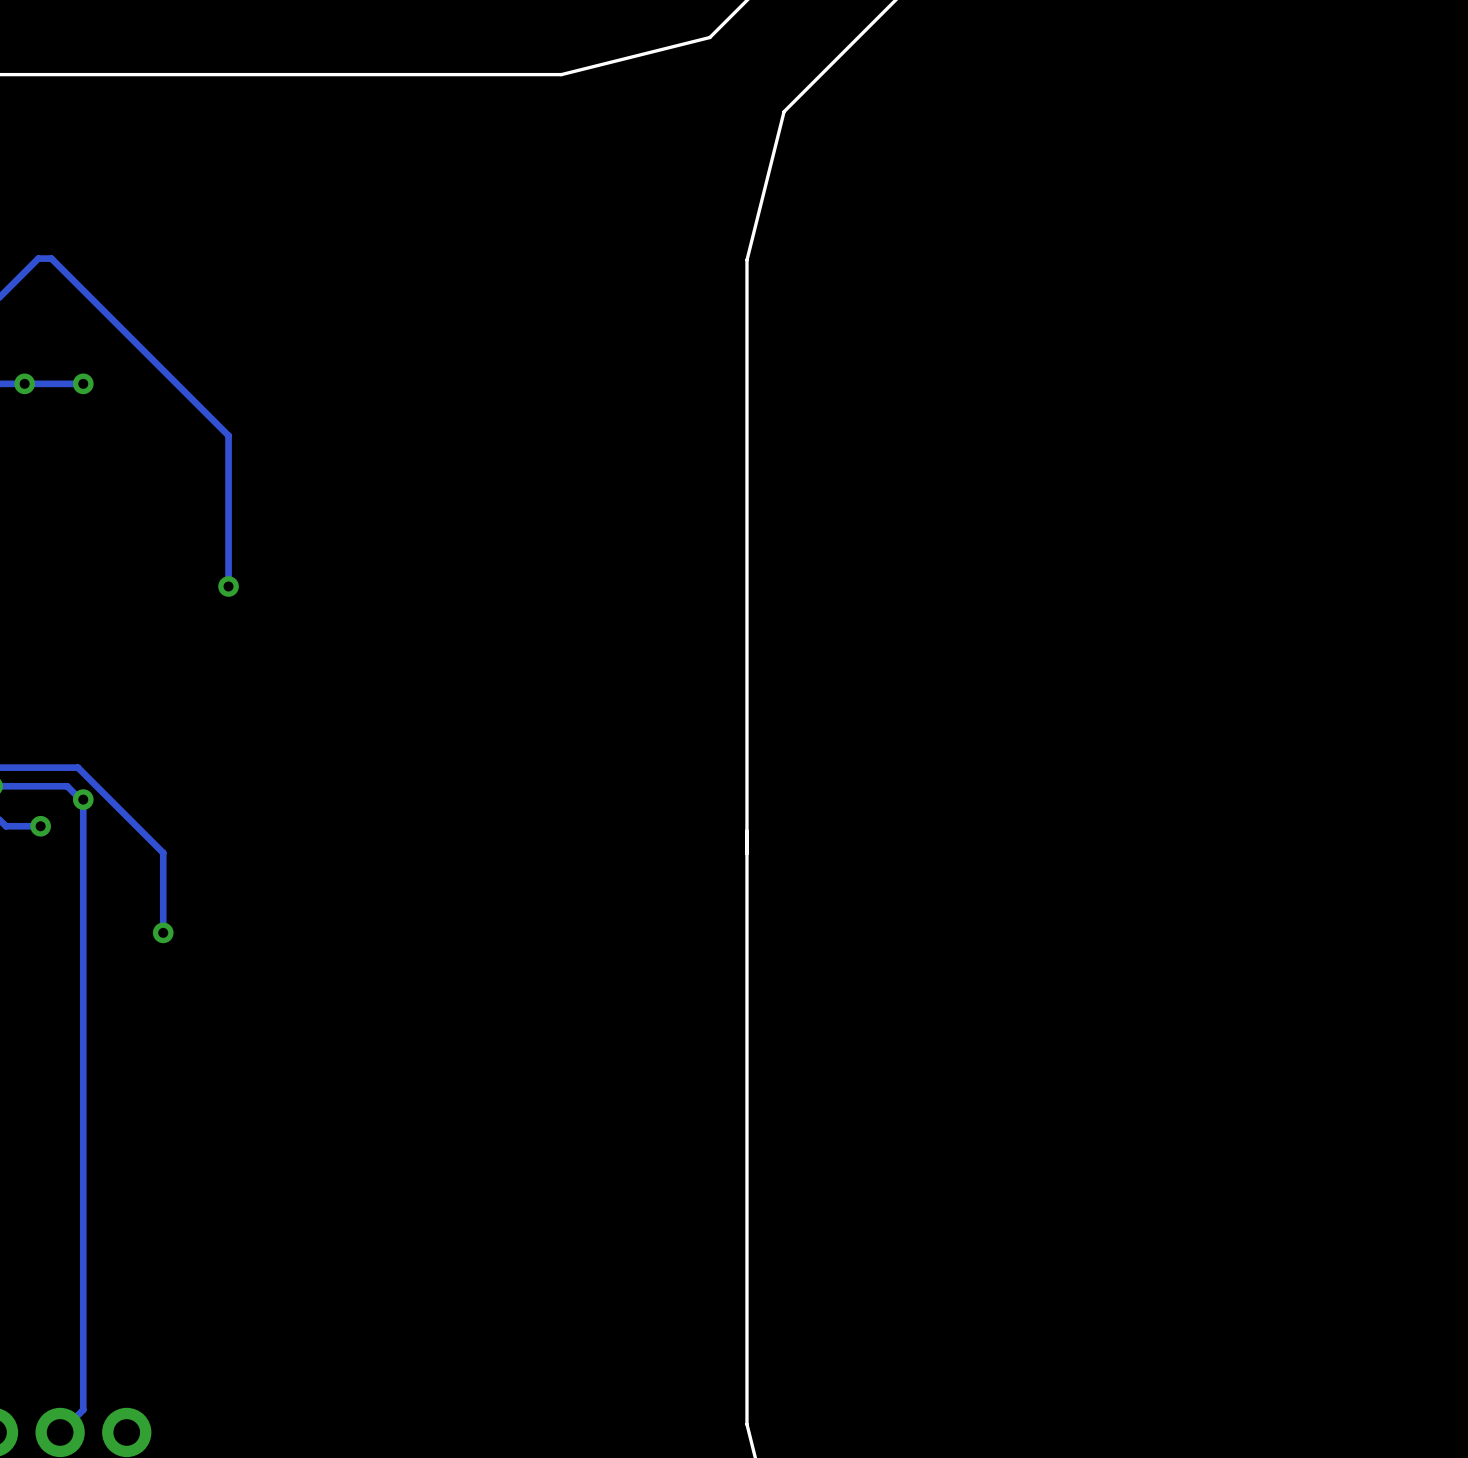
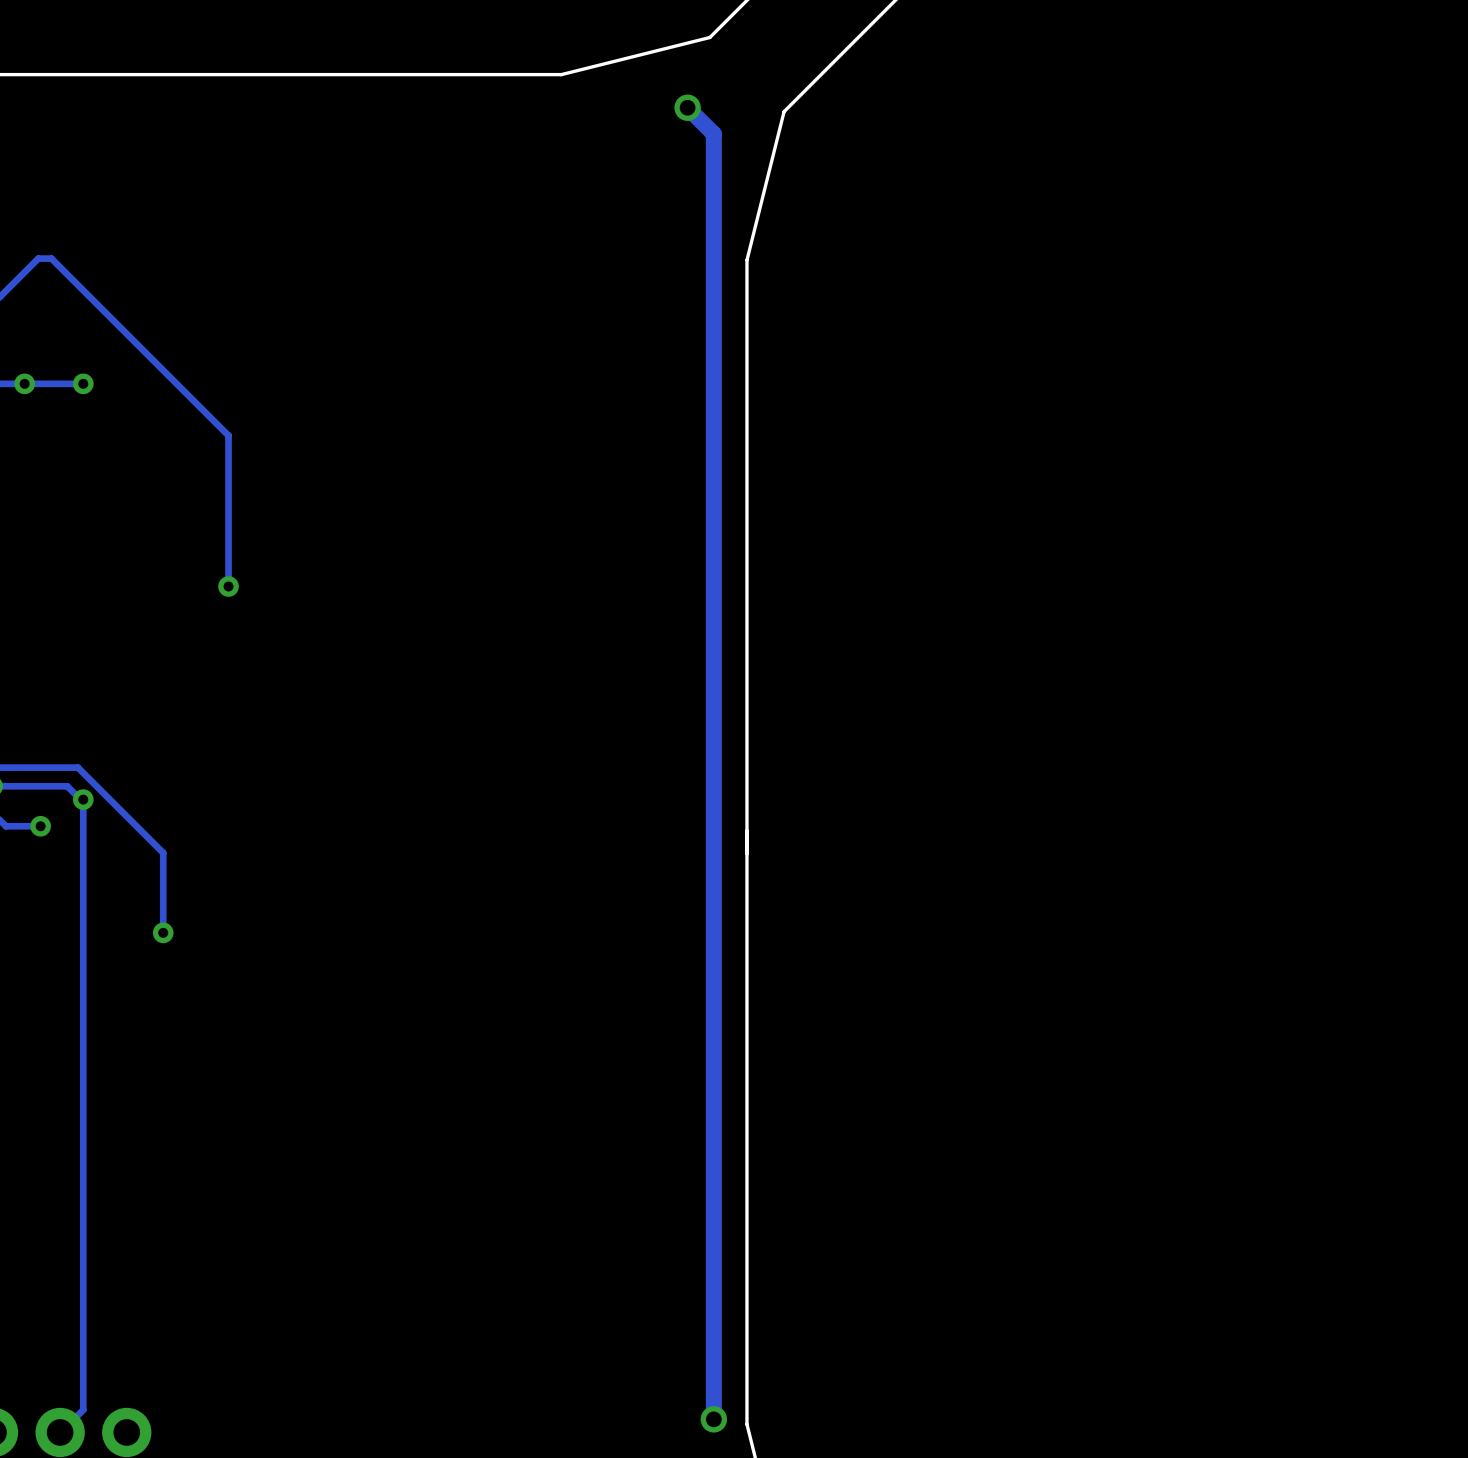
track: none -> (687, 107) (713, 133) (713, 1419)
via: none -> (687, 107)
via: none -> (713, 1419)

